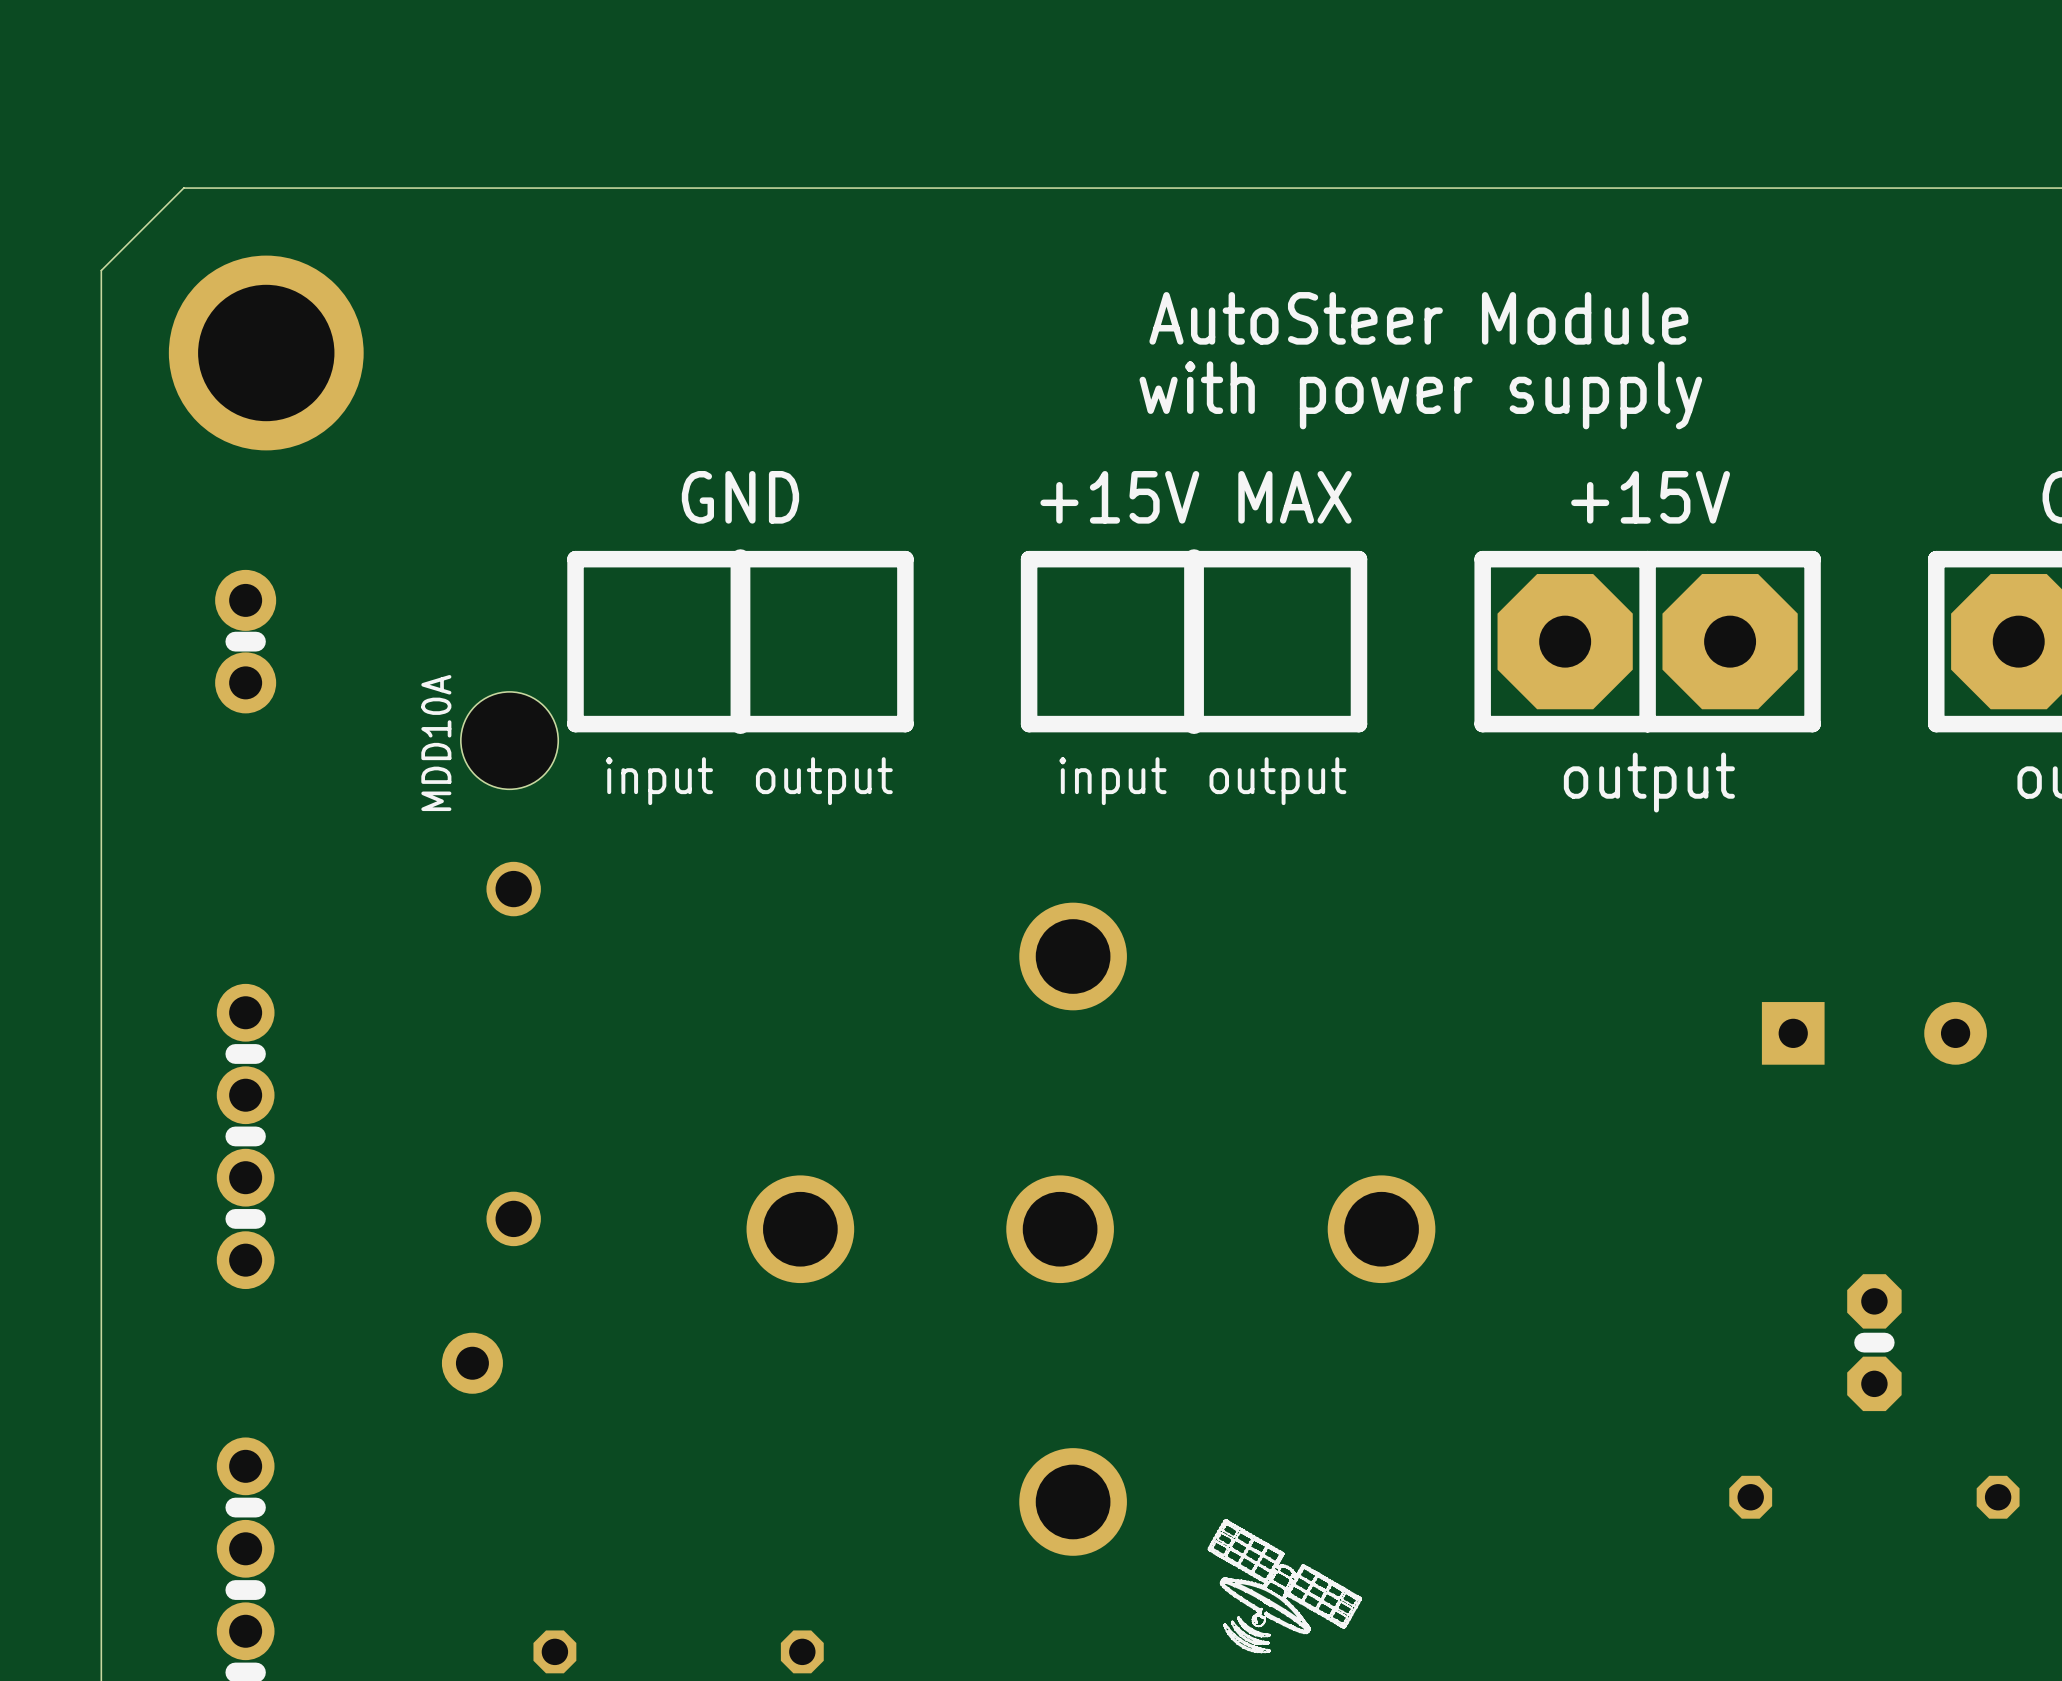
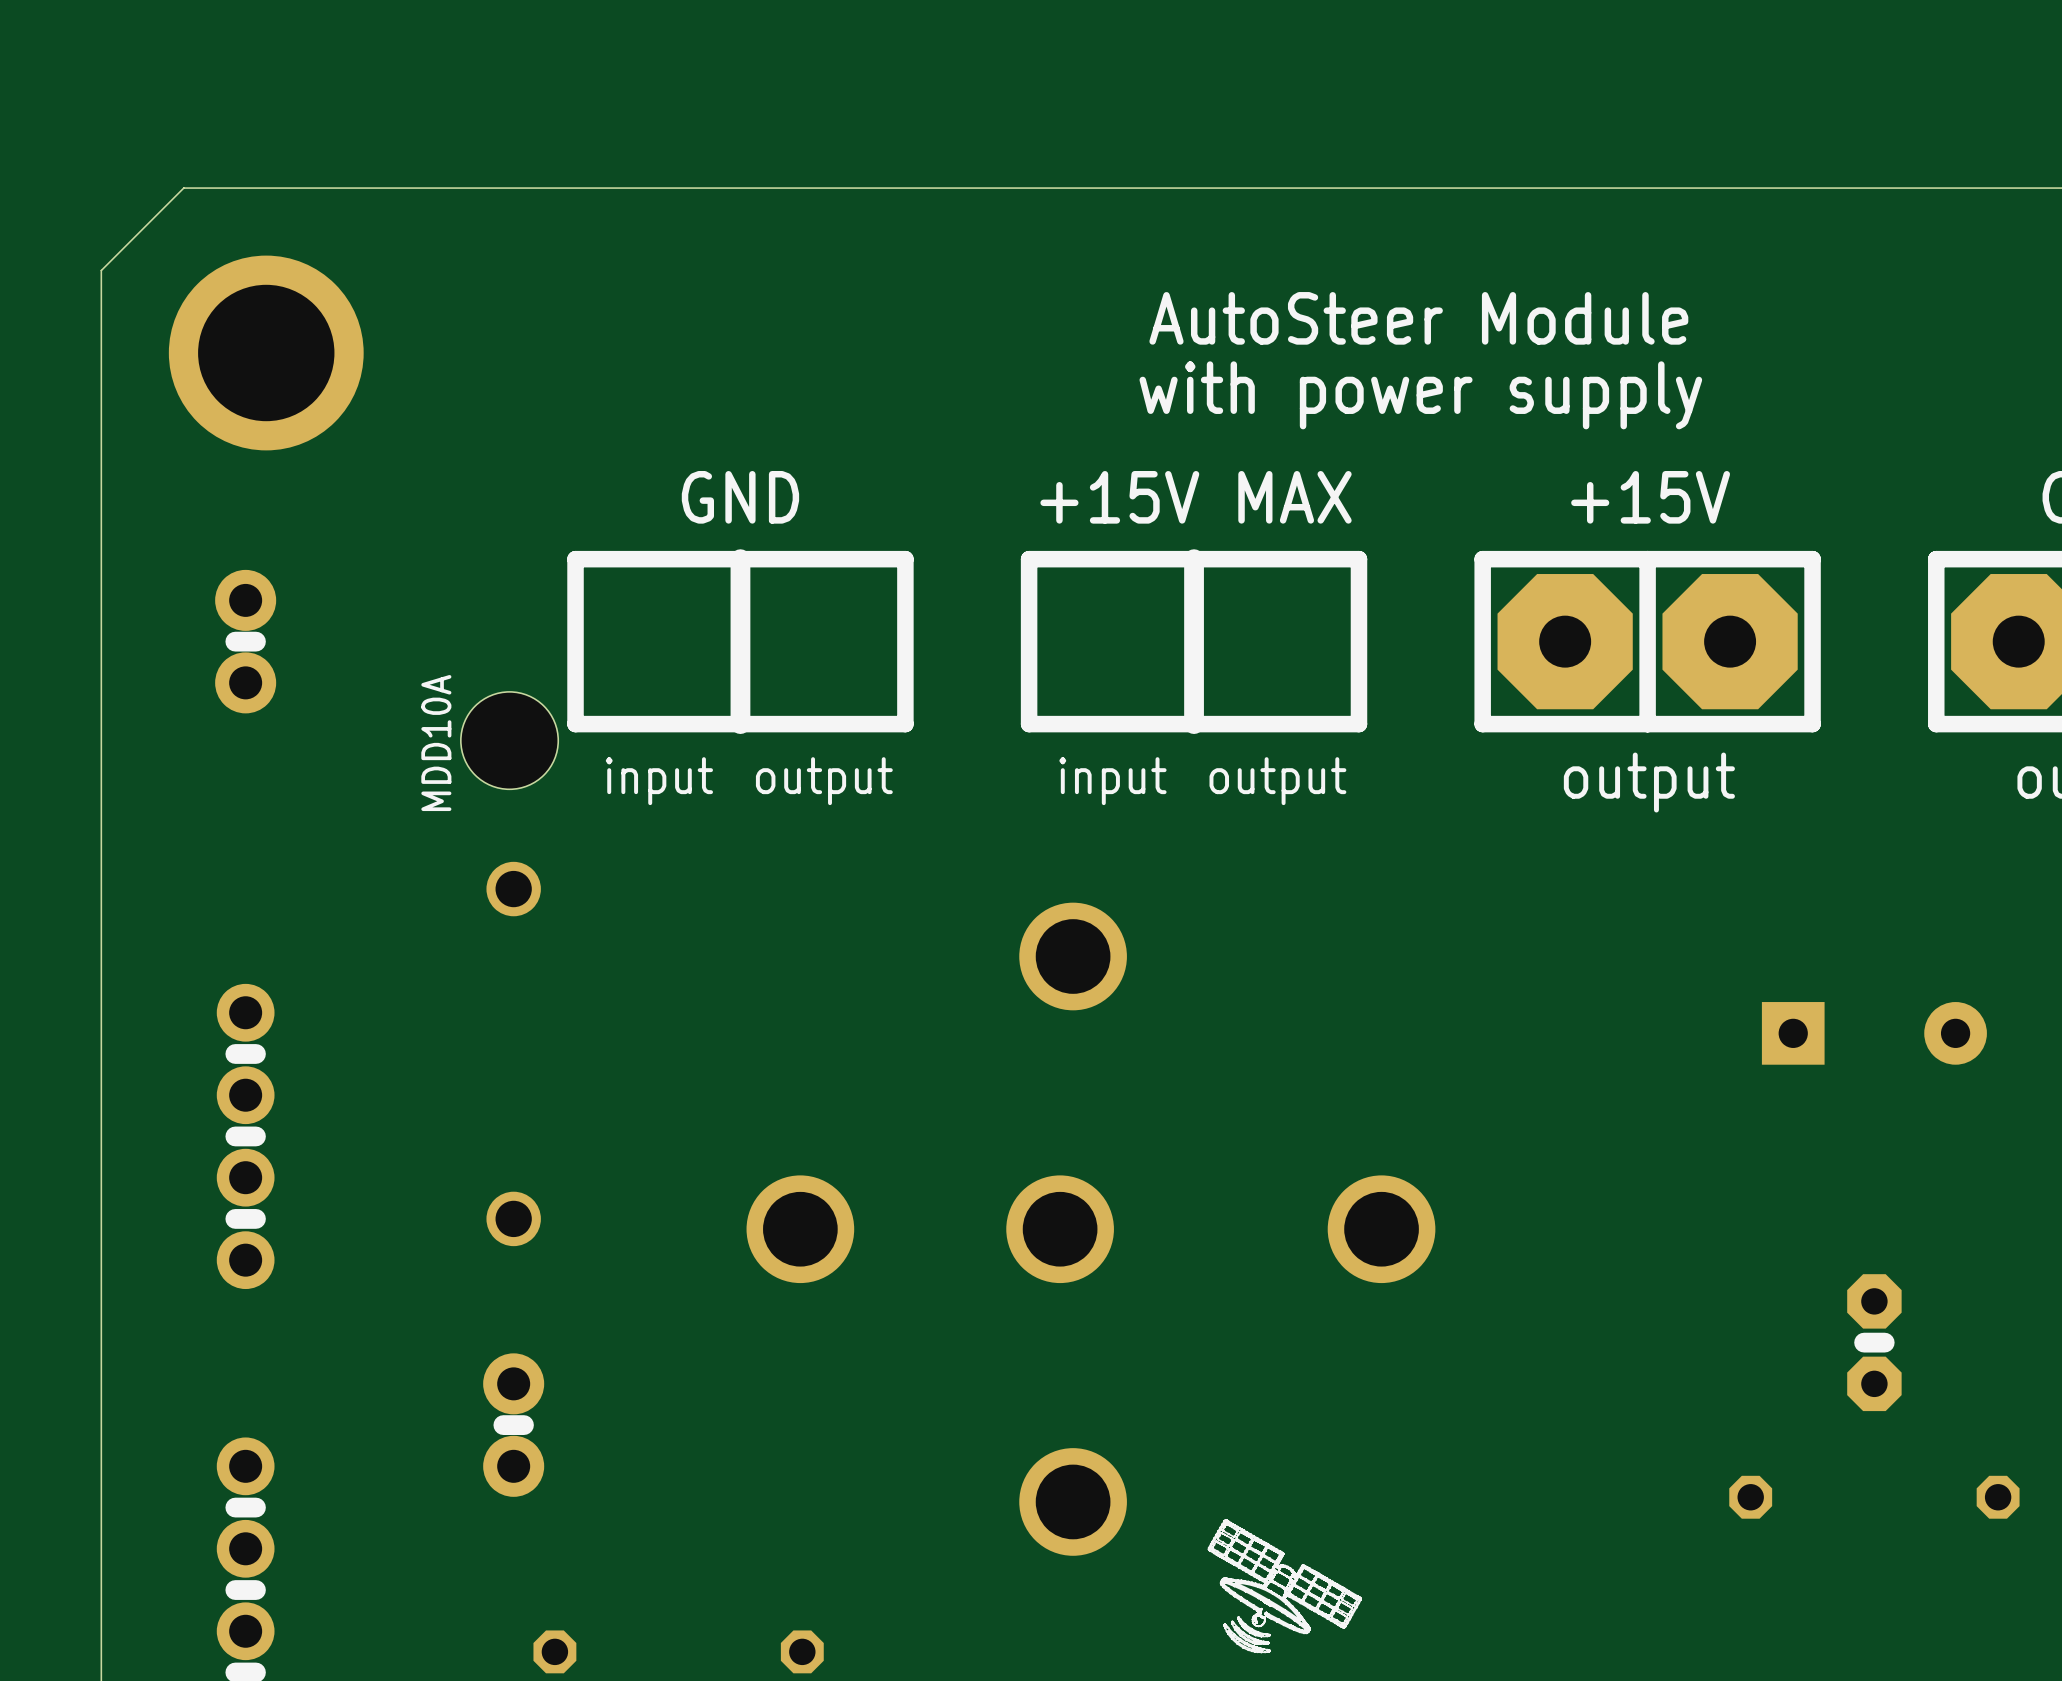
part: (472, 1363) -> none
part: none -> (513, 1425)
line: none -> (523, 1425) (503, 1425)

